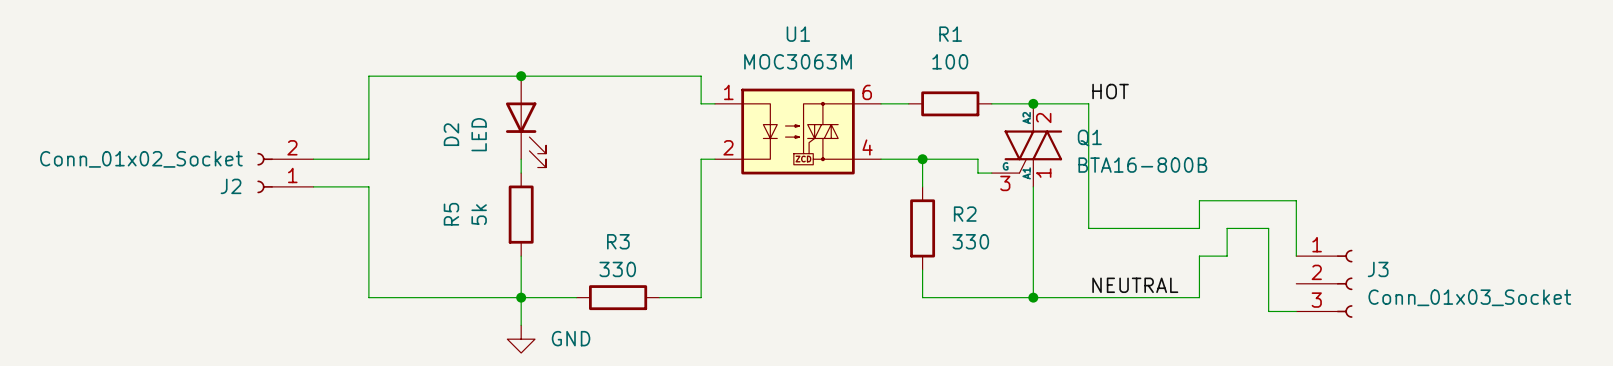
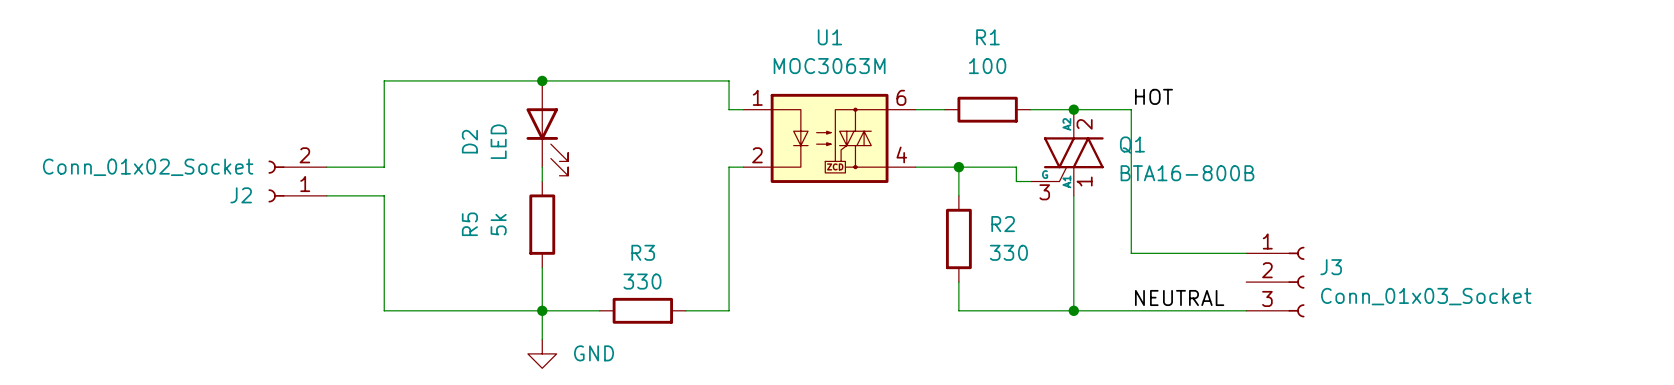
wire: (1088, 228) (1199, 228) (1199, 200) (1296, 200) (1296, 256) -> (1131, 238) (1131, 253) (1246, 253)
J3 position: (1324, 283) -> (1275, 282)
wire: (1199, 297) (1199, 256) (1227, 256) (1227, 228) (1268, 228) (1268, 311) (1296, 311) -> none

